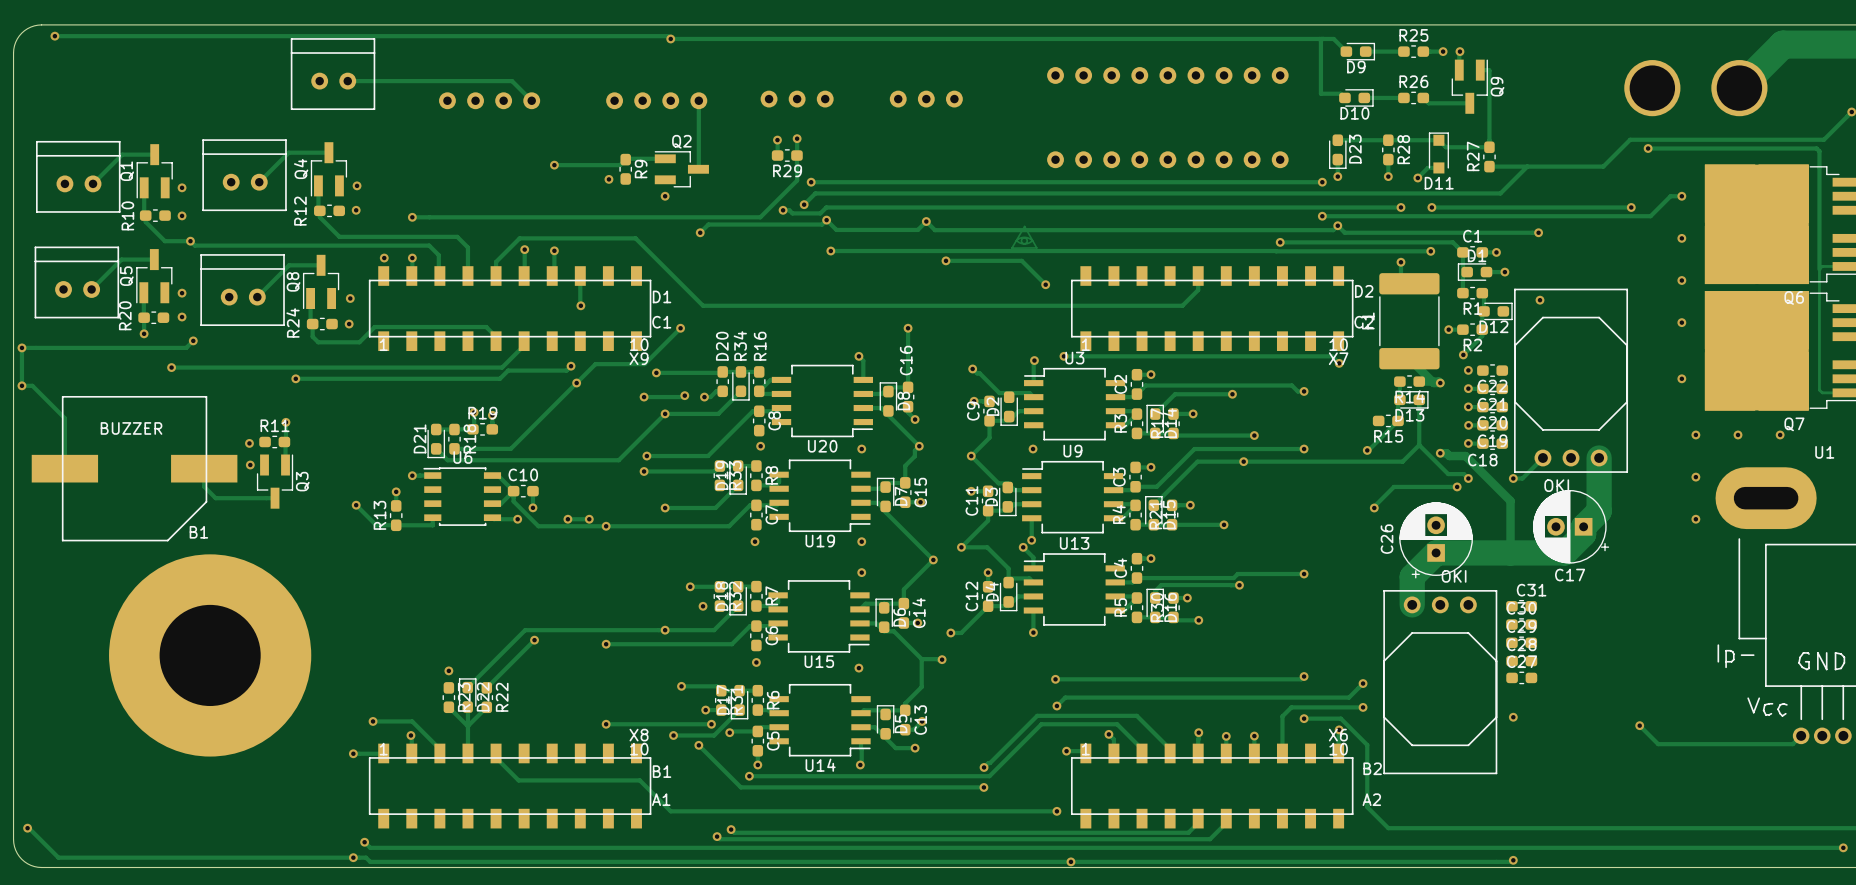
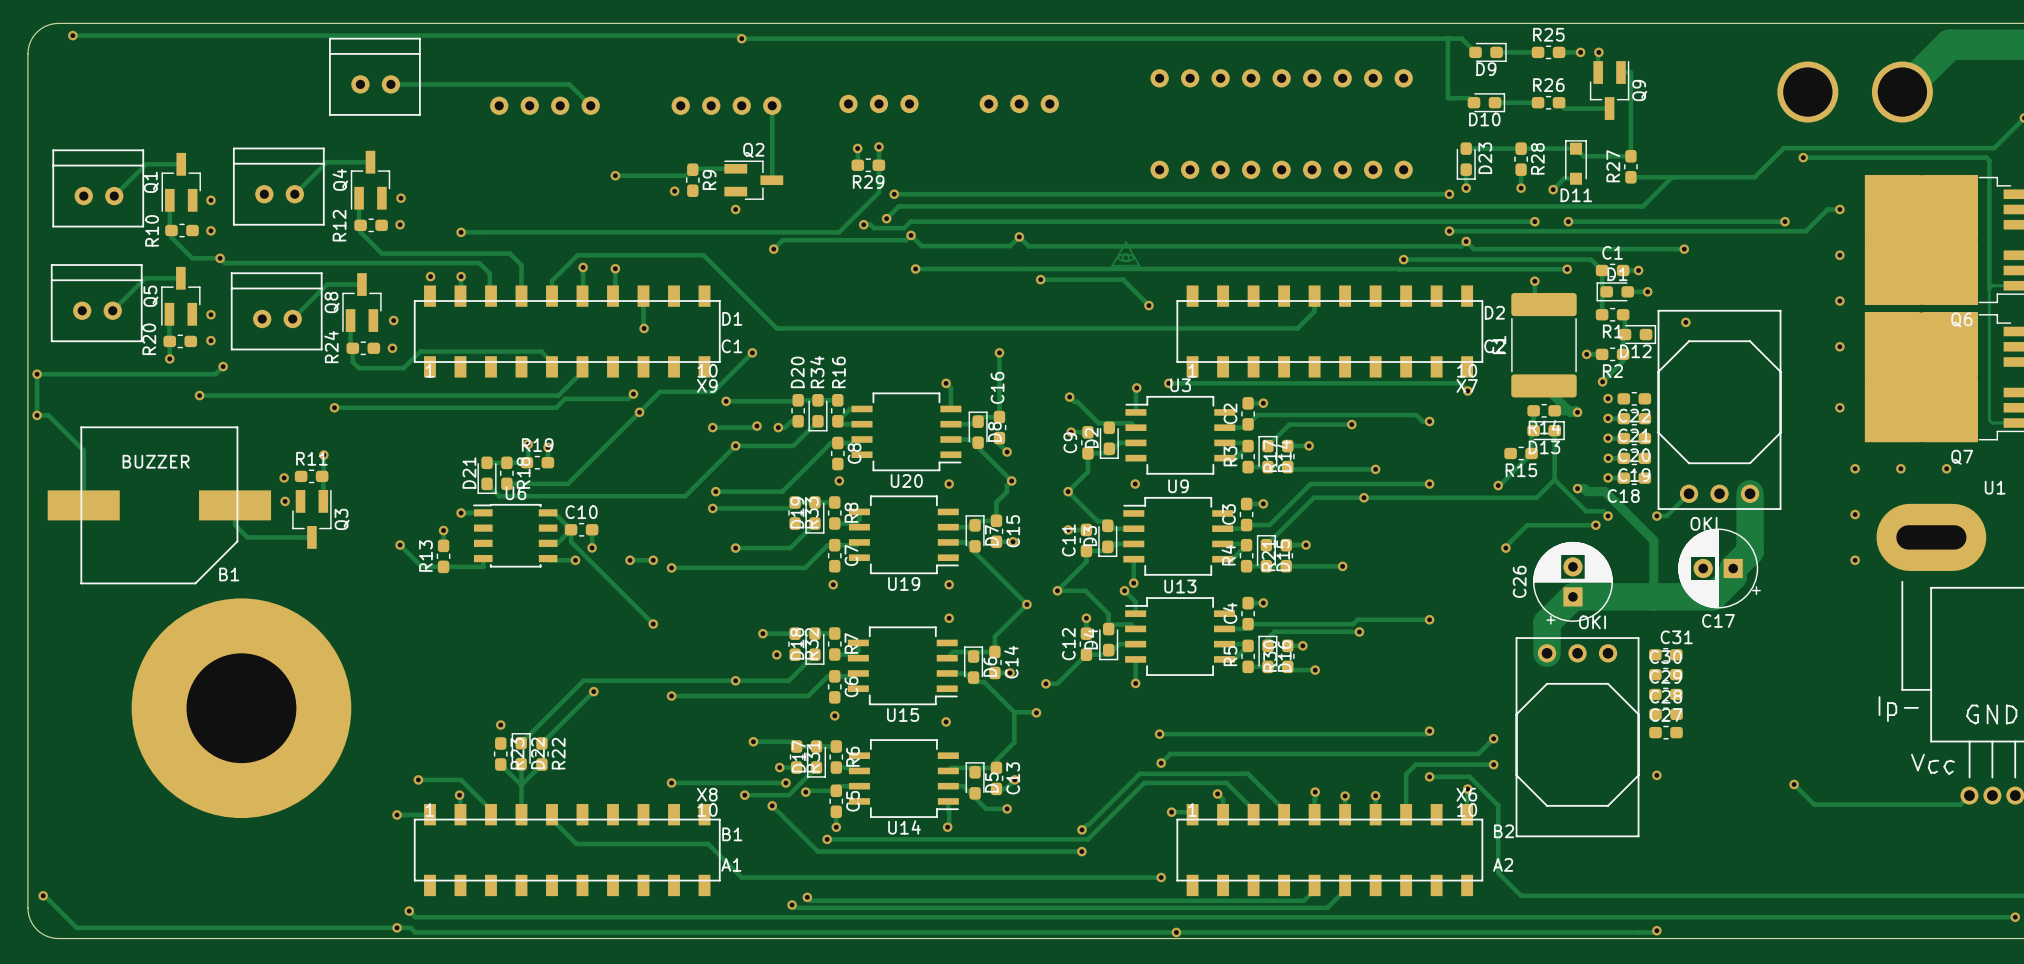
track: (513, 501) (538, 526) (606, 526) -> (571, 540) (653, 624)
via: none -> (653, 624)

